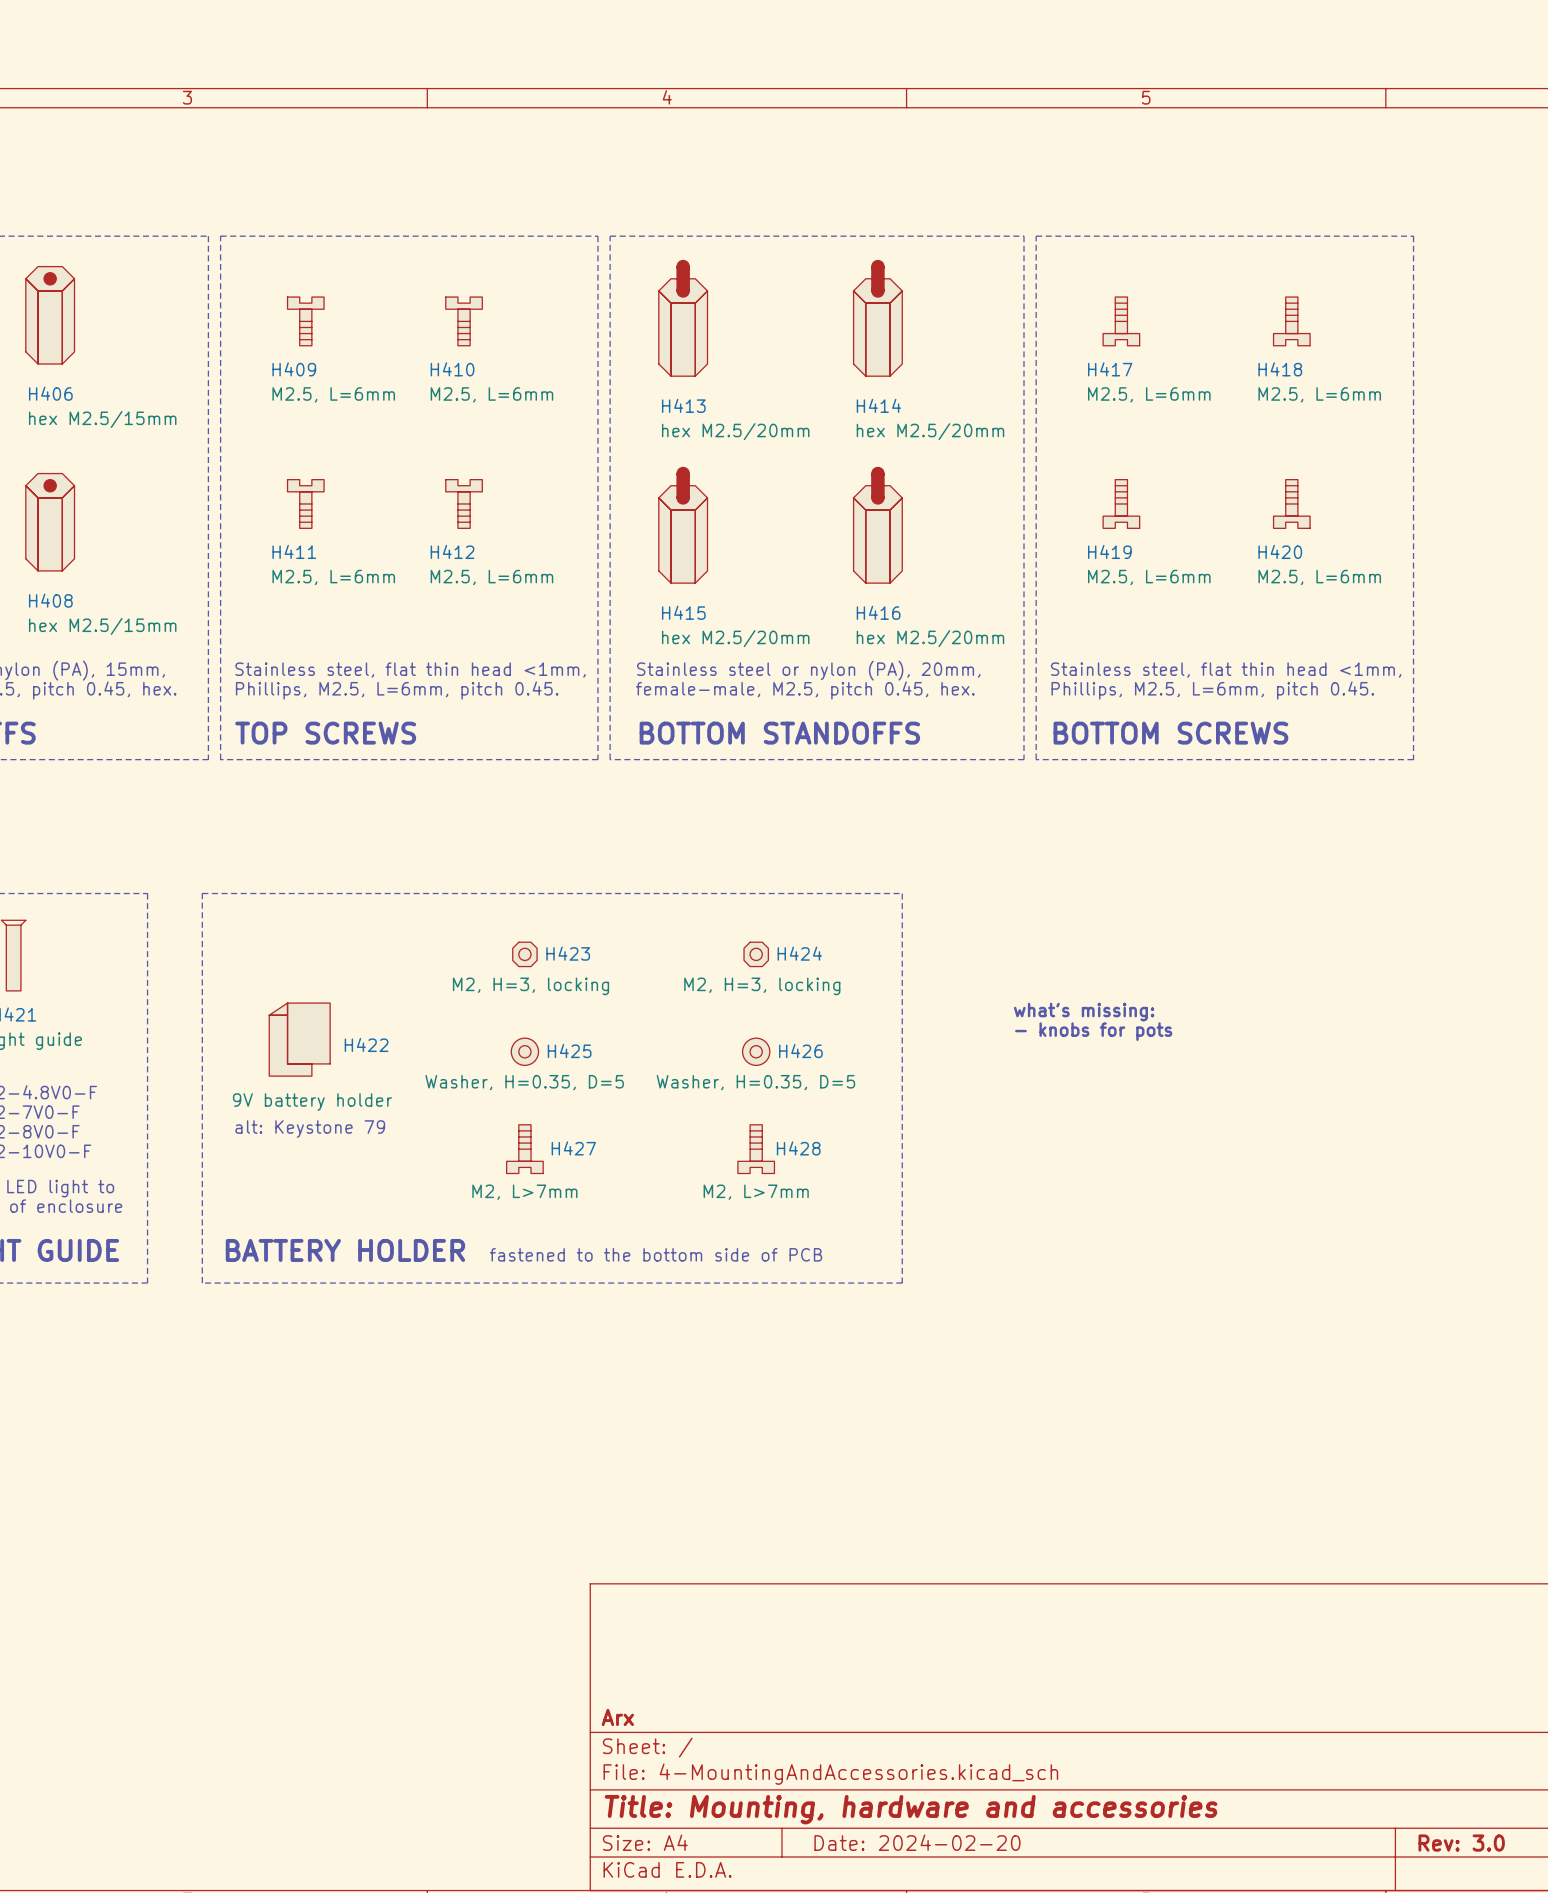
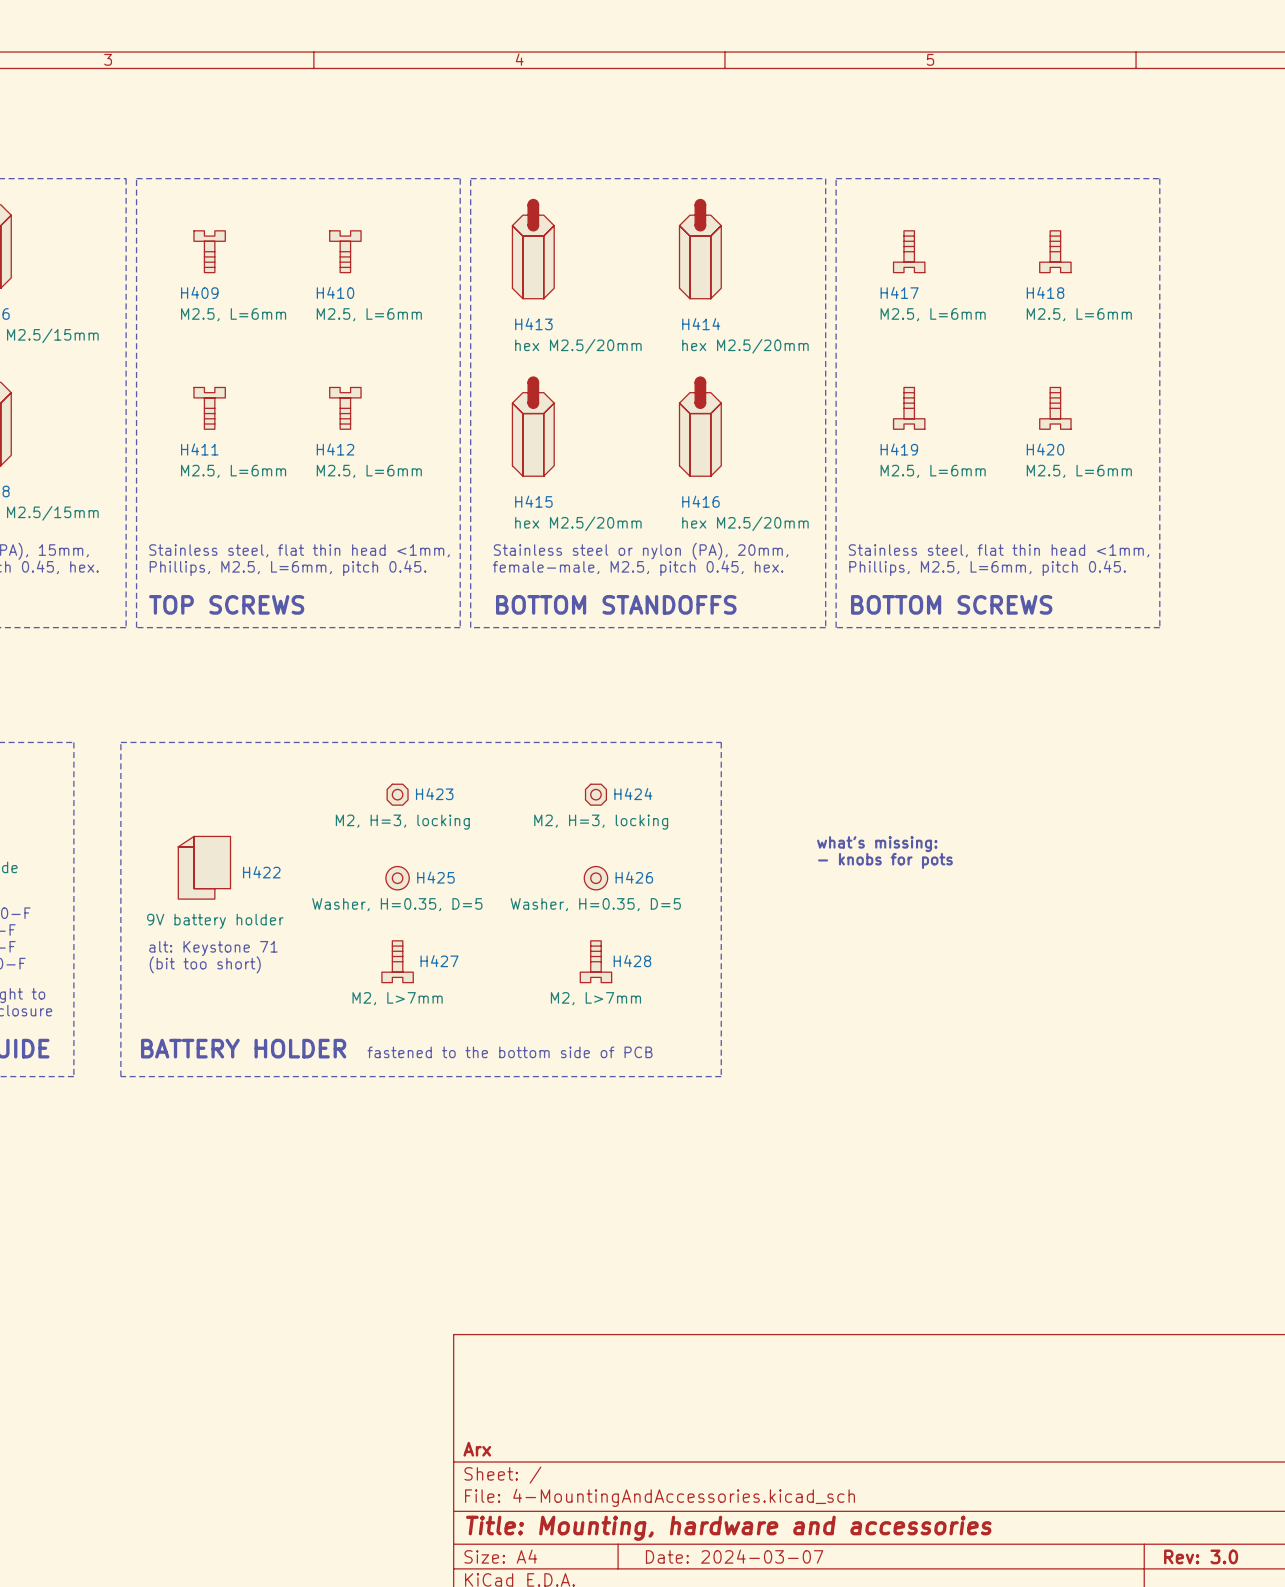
text: alt: Keystone 79 (310, 1129) -> alt: Keystone 71 (213, 948)
text: none -> (bit too short) (205, 964)
title block: Date: 2024-02-20 (917, 1842) -> Date: 2024-03-07 (734, 1556)

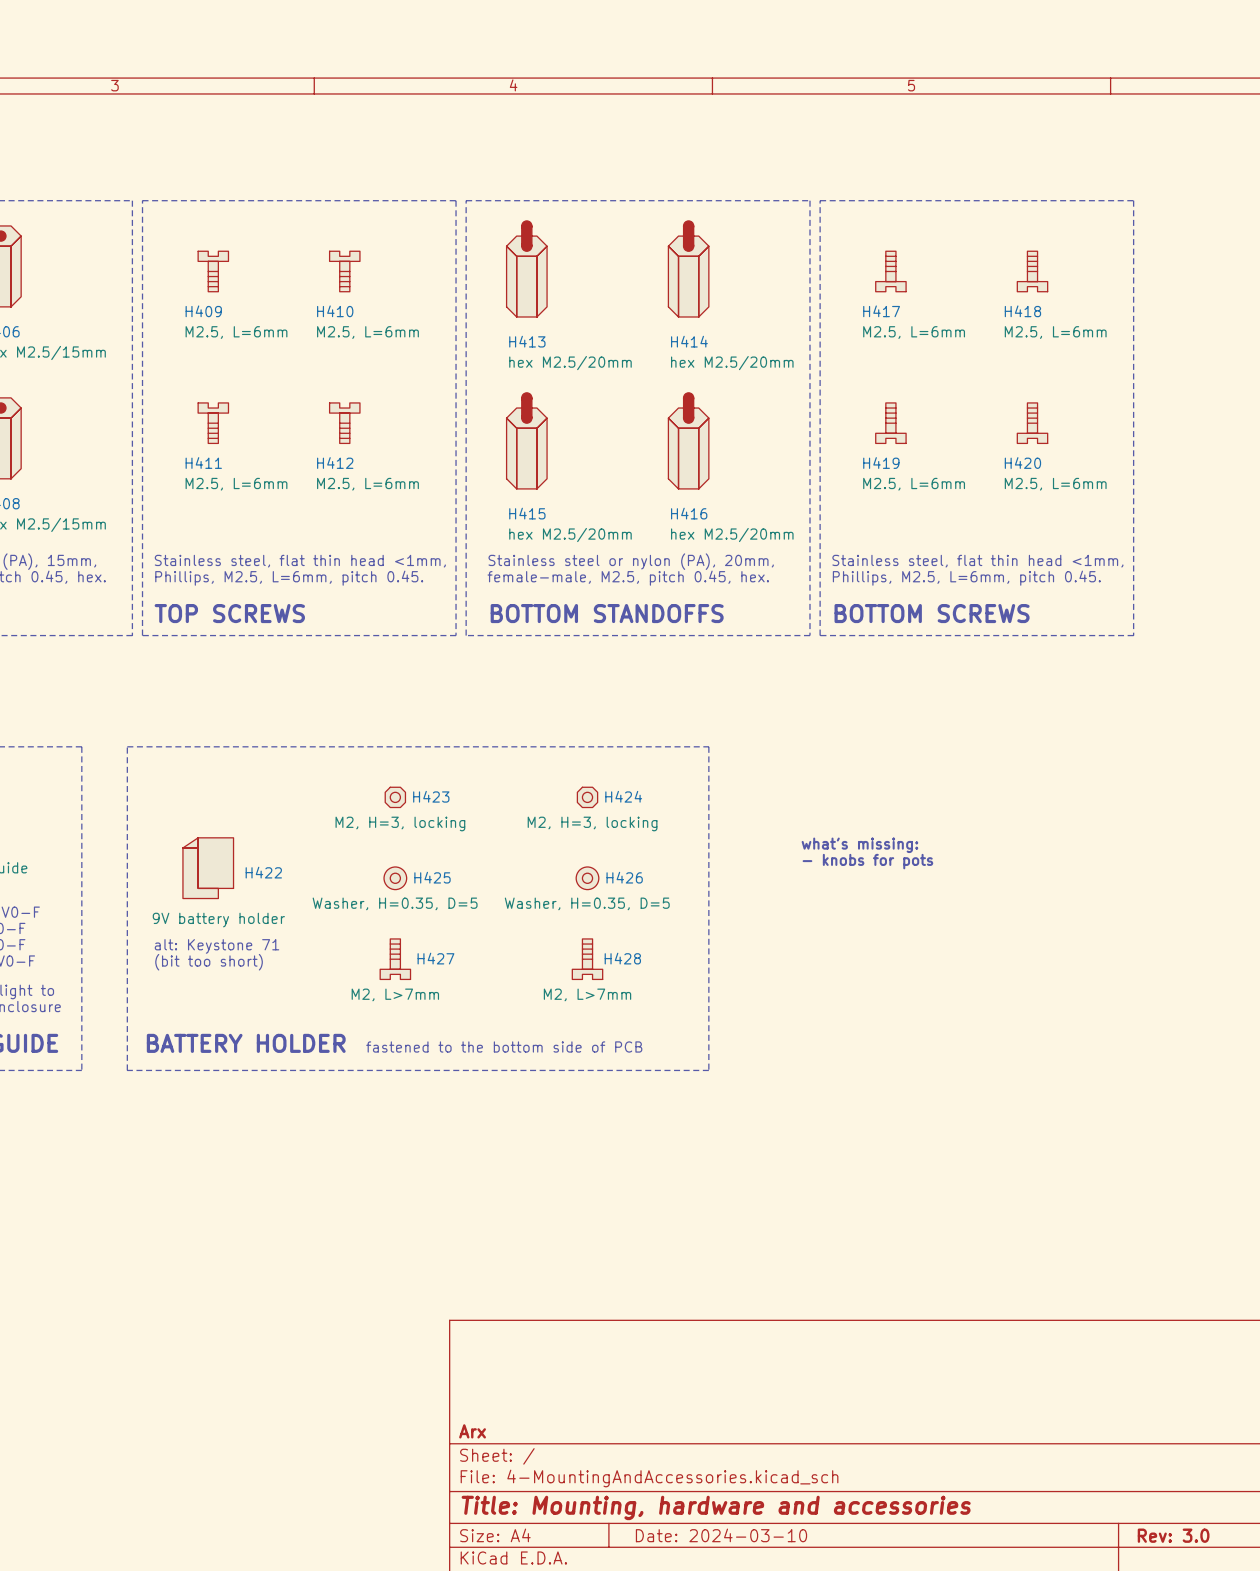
title block: Date: 2024-03-07 (734, 1556) -> Date: 2024-03-10 (721, 1535)

